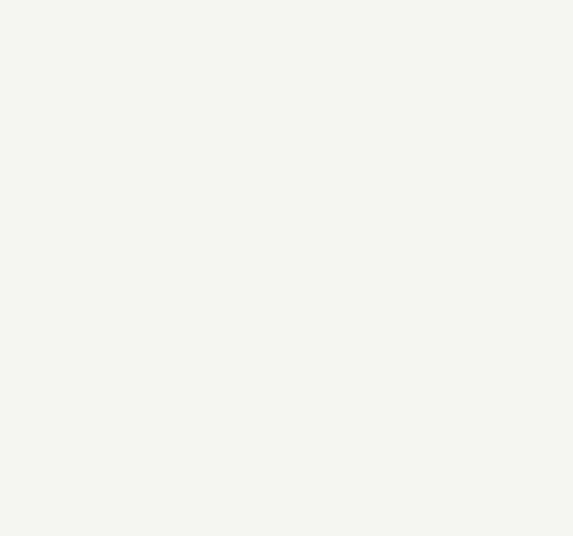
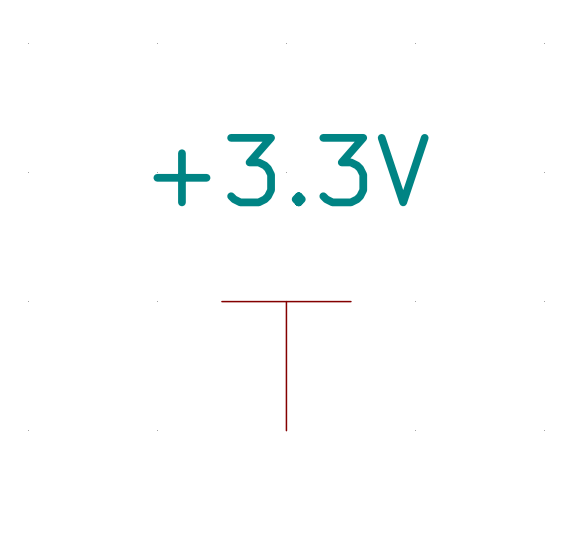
power symbol: none -> +3.3V (286, 366)

